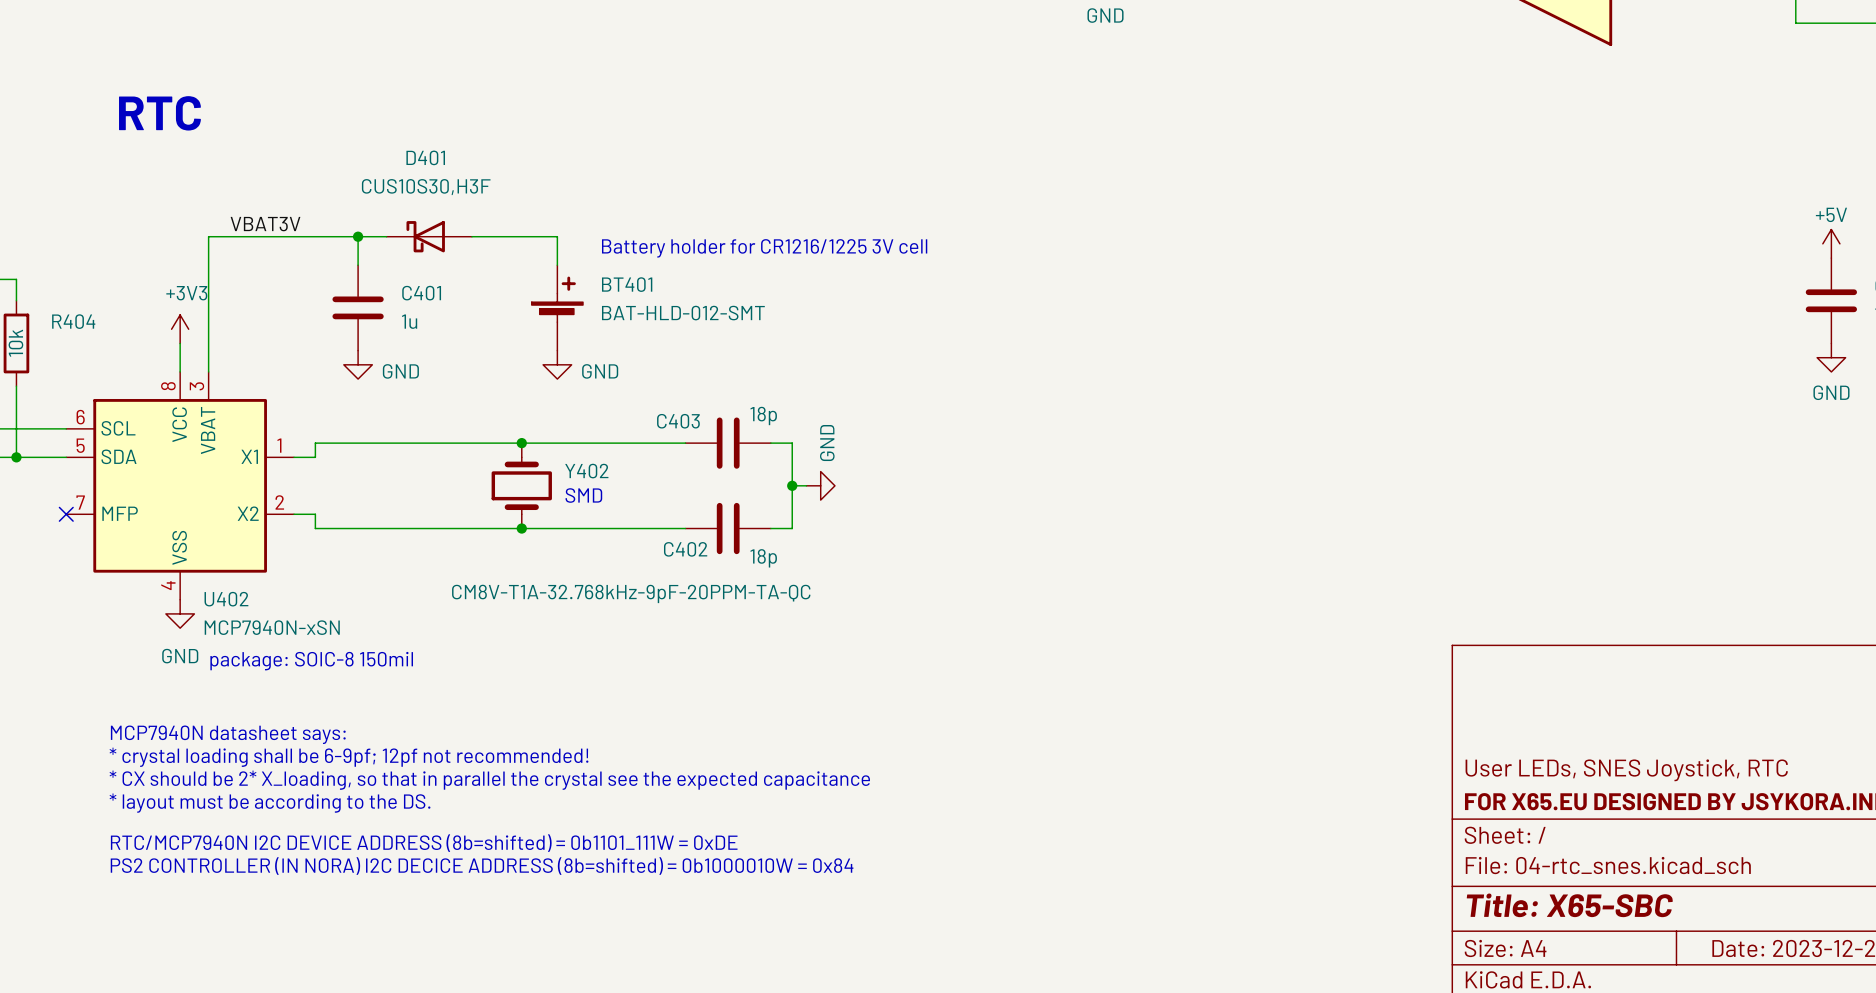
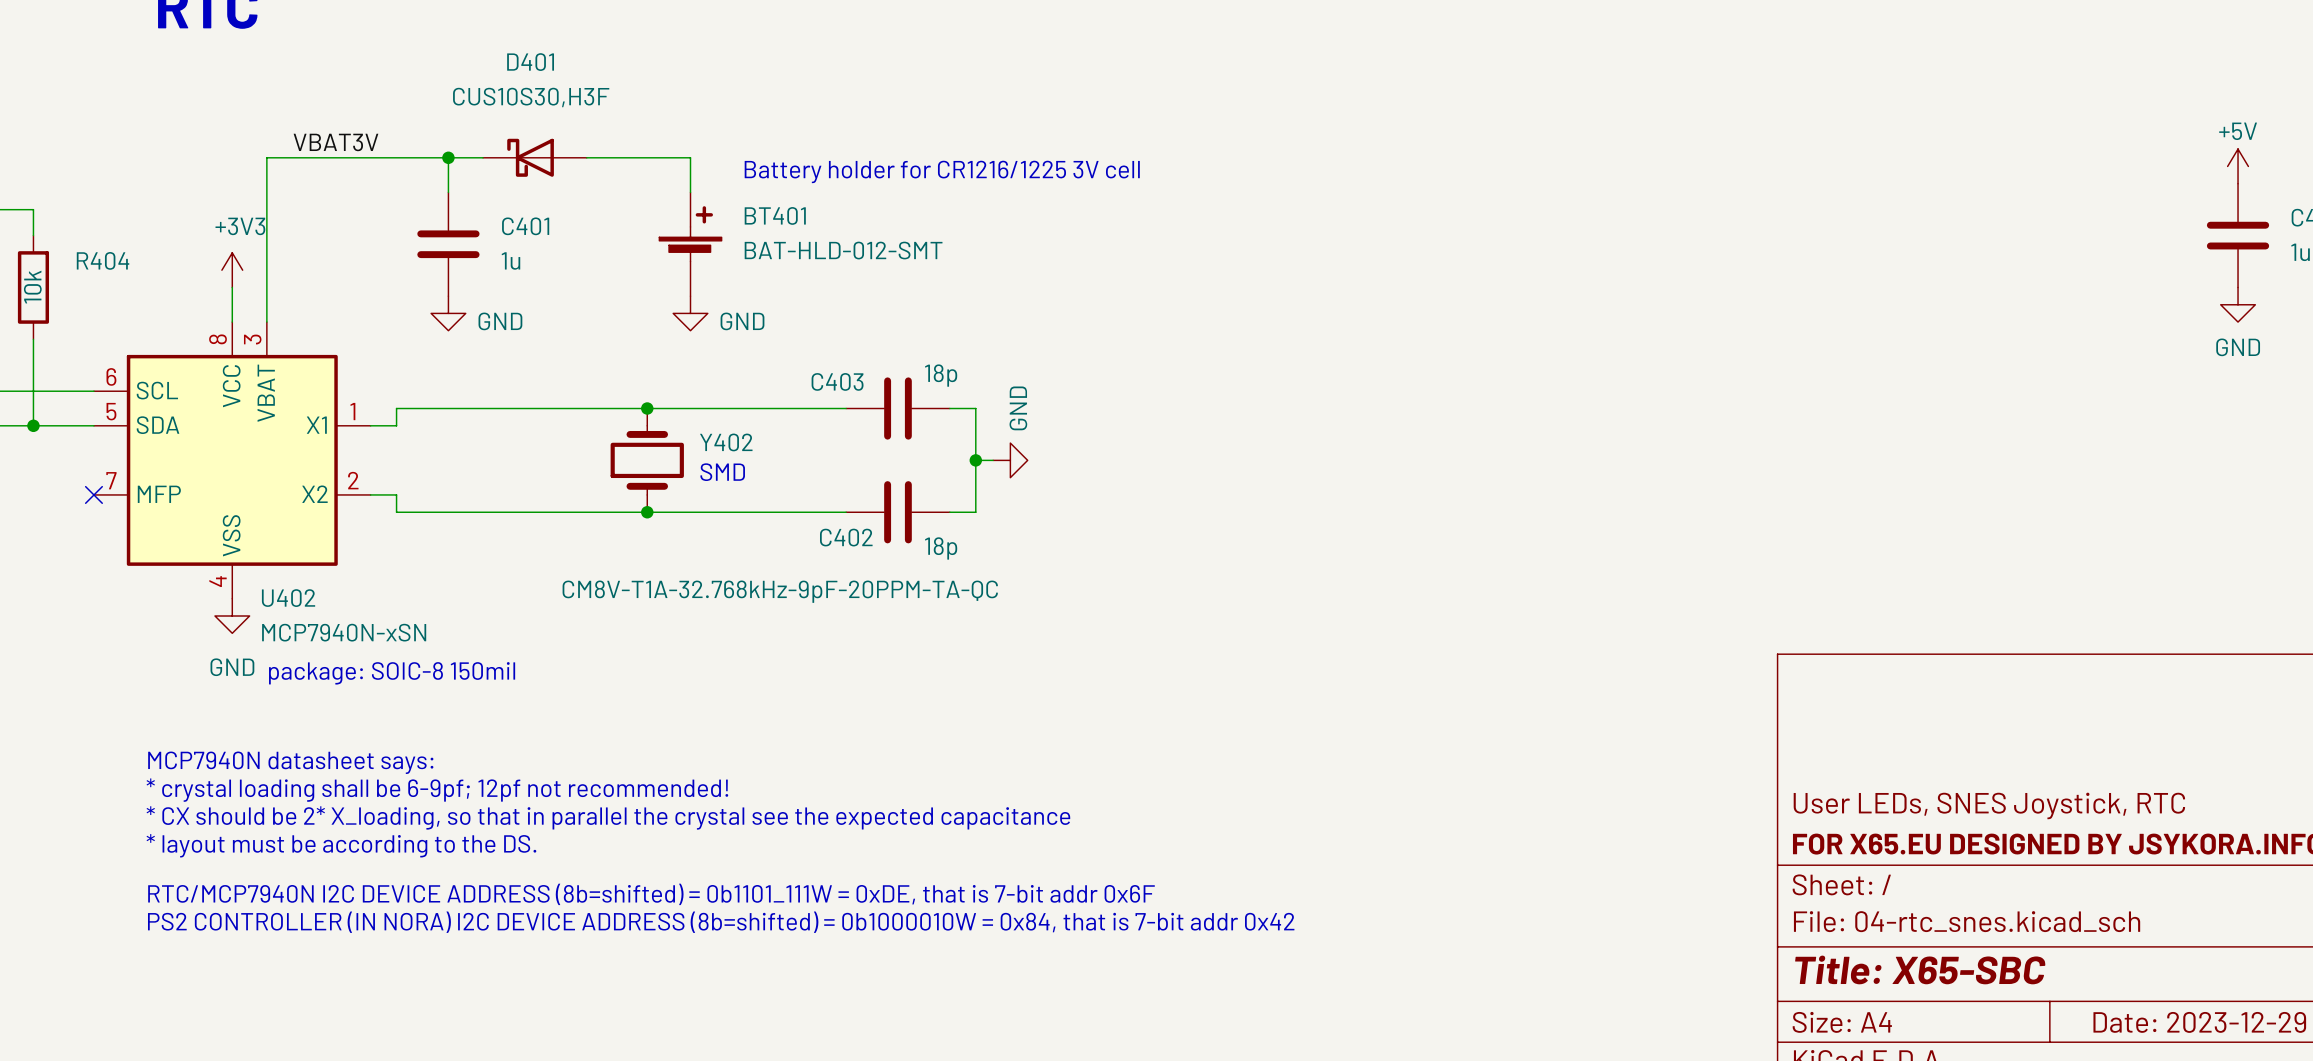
text: RTC/MCP7940N I2C DEVICE ADDRESS (8b=shifted) = 0b1101_111W = 0xDE (424, 843) -> RTC/MCP7940N I2C DEVICE ADDRESS (8b=shifted) = 0b1101_111W = 0xDE, that is 7-bit addr 0x6F (651, 894)
text: PS2 CONTROLLER (IN NORA) I2C DECICE ADDRESS (8b=shifted) = 0b1000010W = 0x84 (482, 866) -> PS2 CONTROLLER (IN NORA) I2C DEVICE ADDRESS (8b=shifted) = 0b1000010W = 0x84, that is 7-bit addr 0x42 (721, 922)

